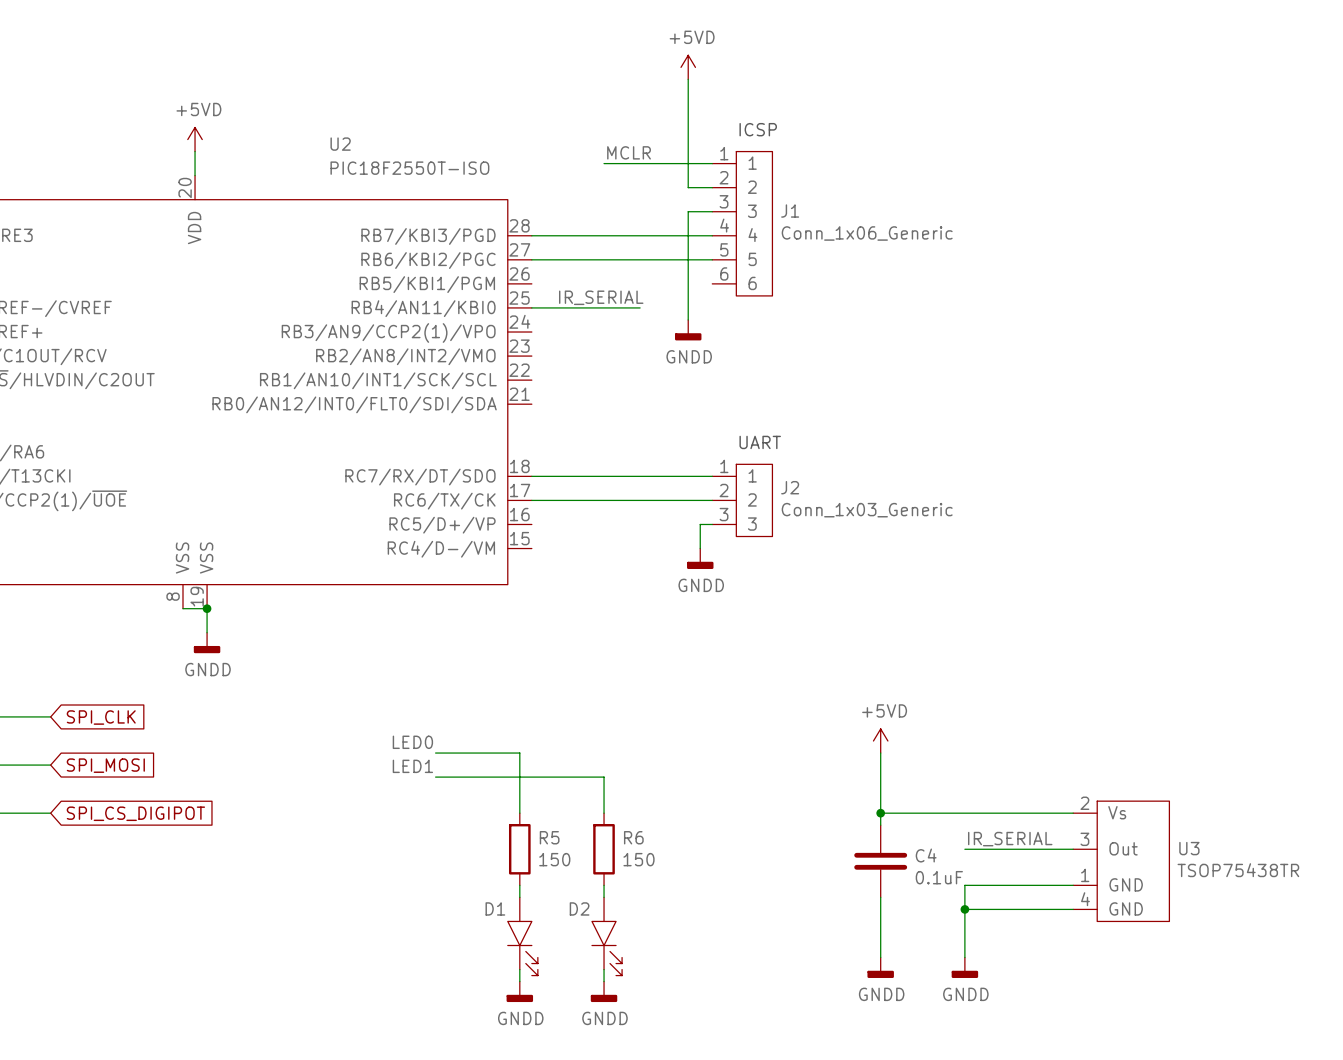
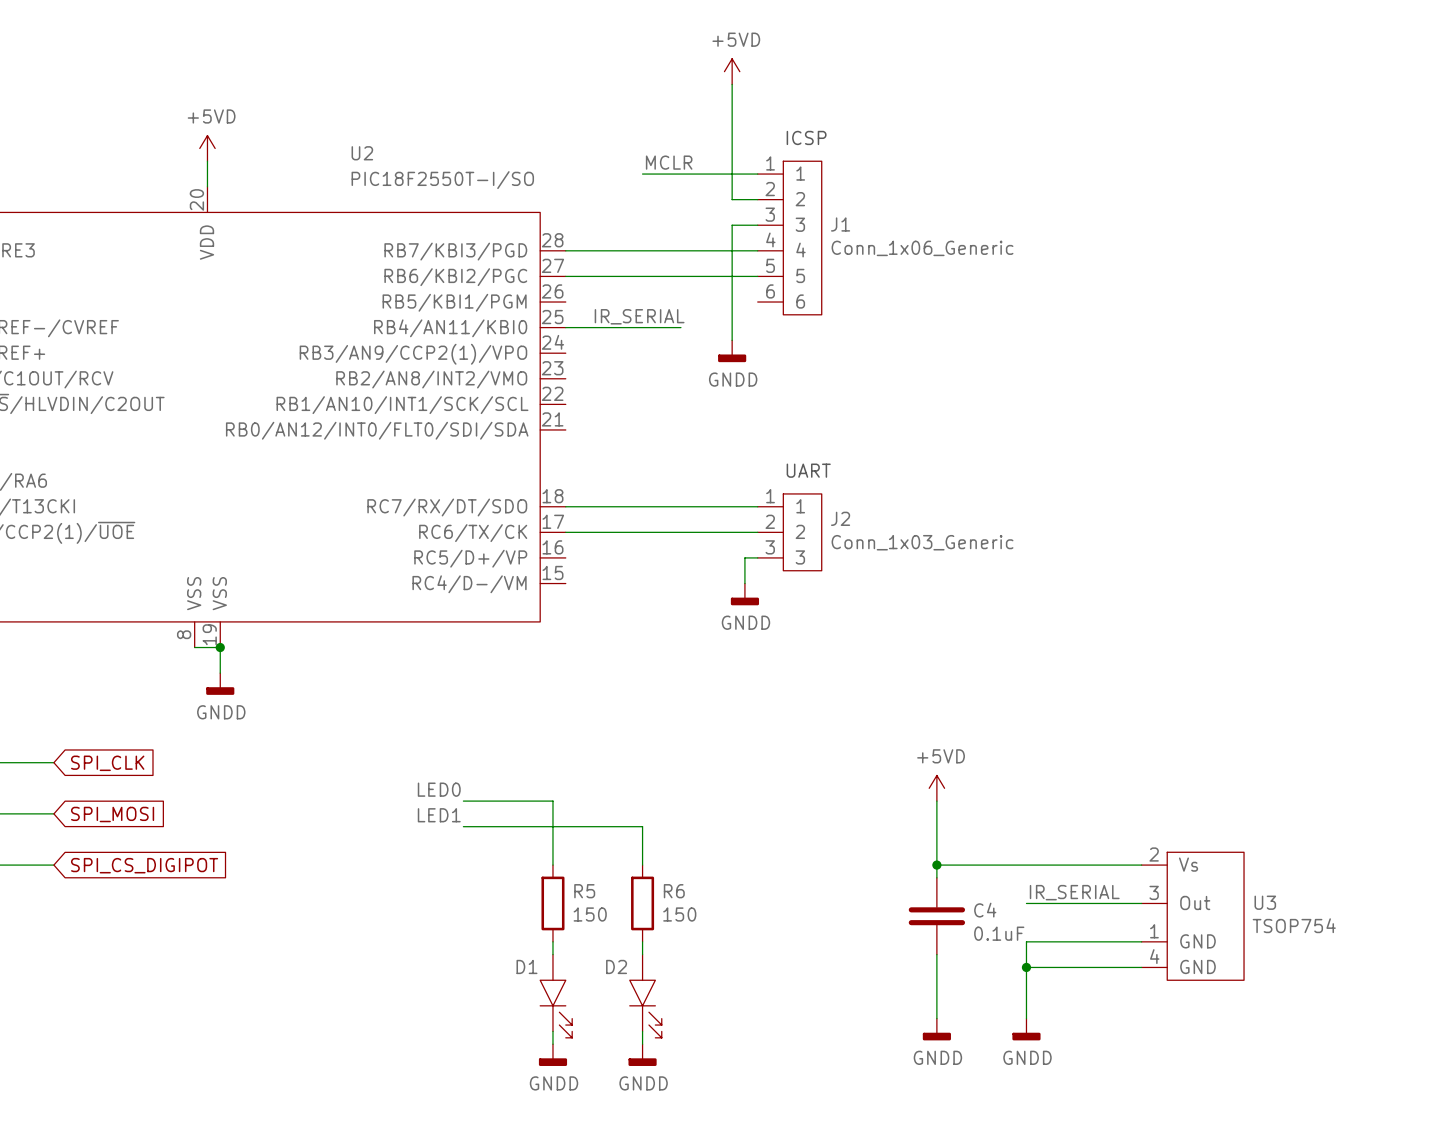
U2 value: PIC18F2550T-ISO (409, 168) -> PIC18F2550T-I/SO (442, 180)
U3 value: TSOP75438TR (1238, 870) -> TSOP754 (1294, 925)

